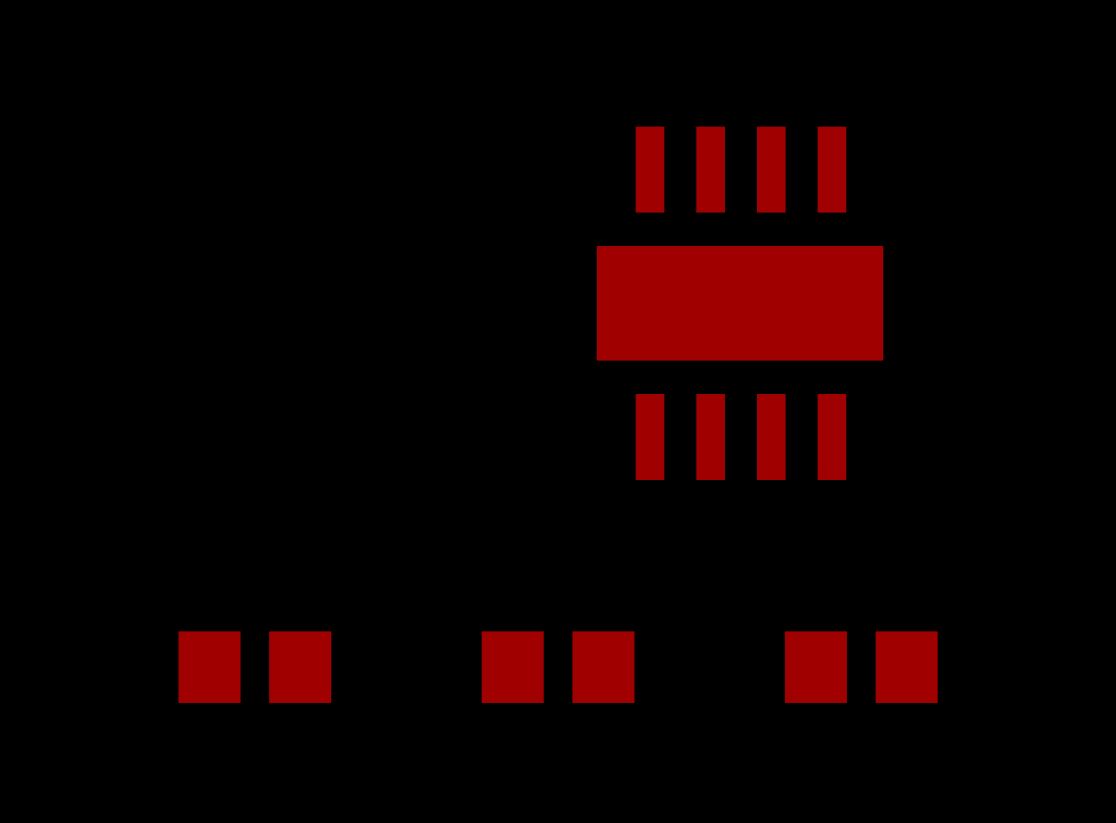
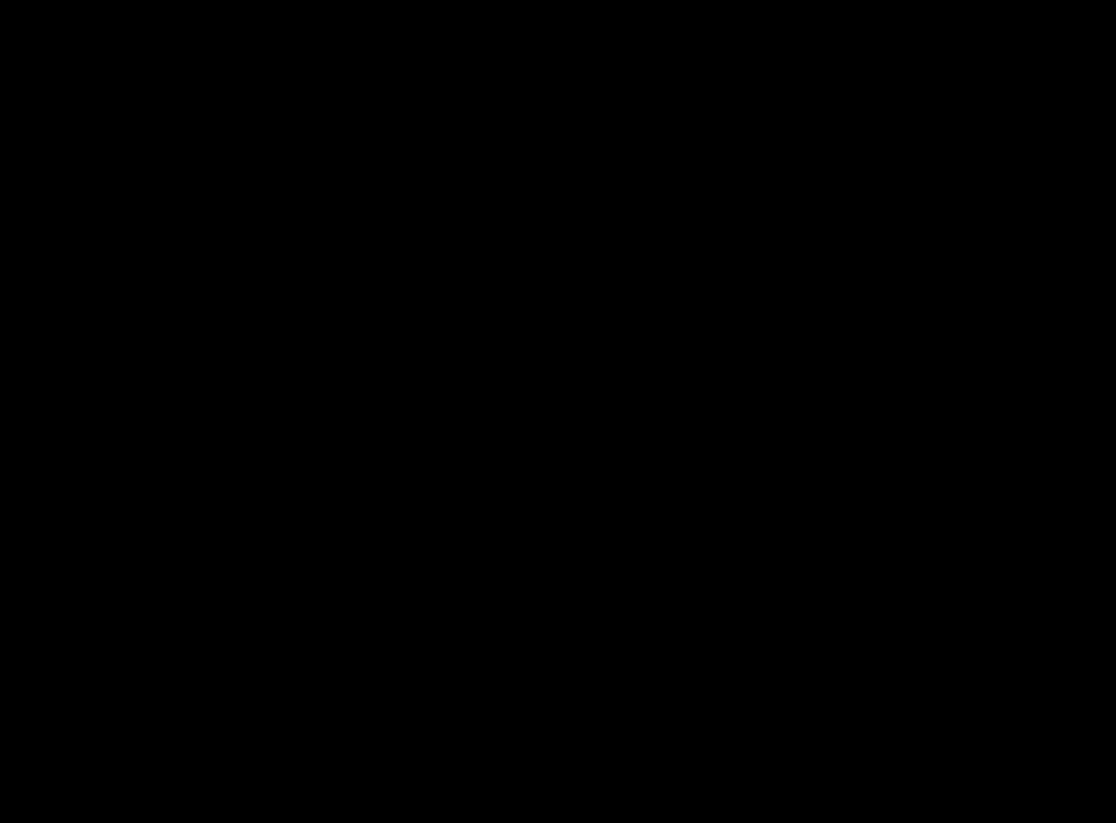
part: (740, 303) -> none
part: (254, 667) -> none
part: (558, 667) -> none
part: (861, 667) -> none

